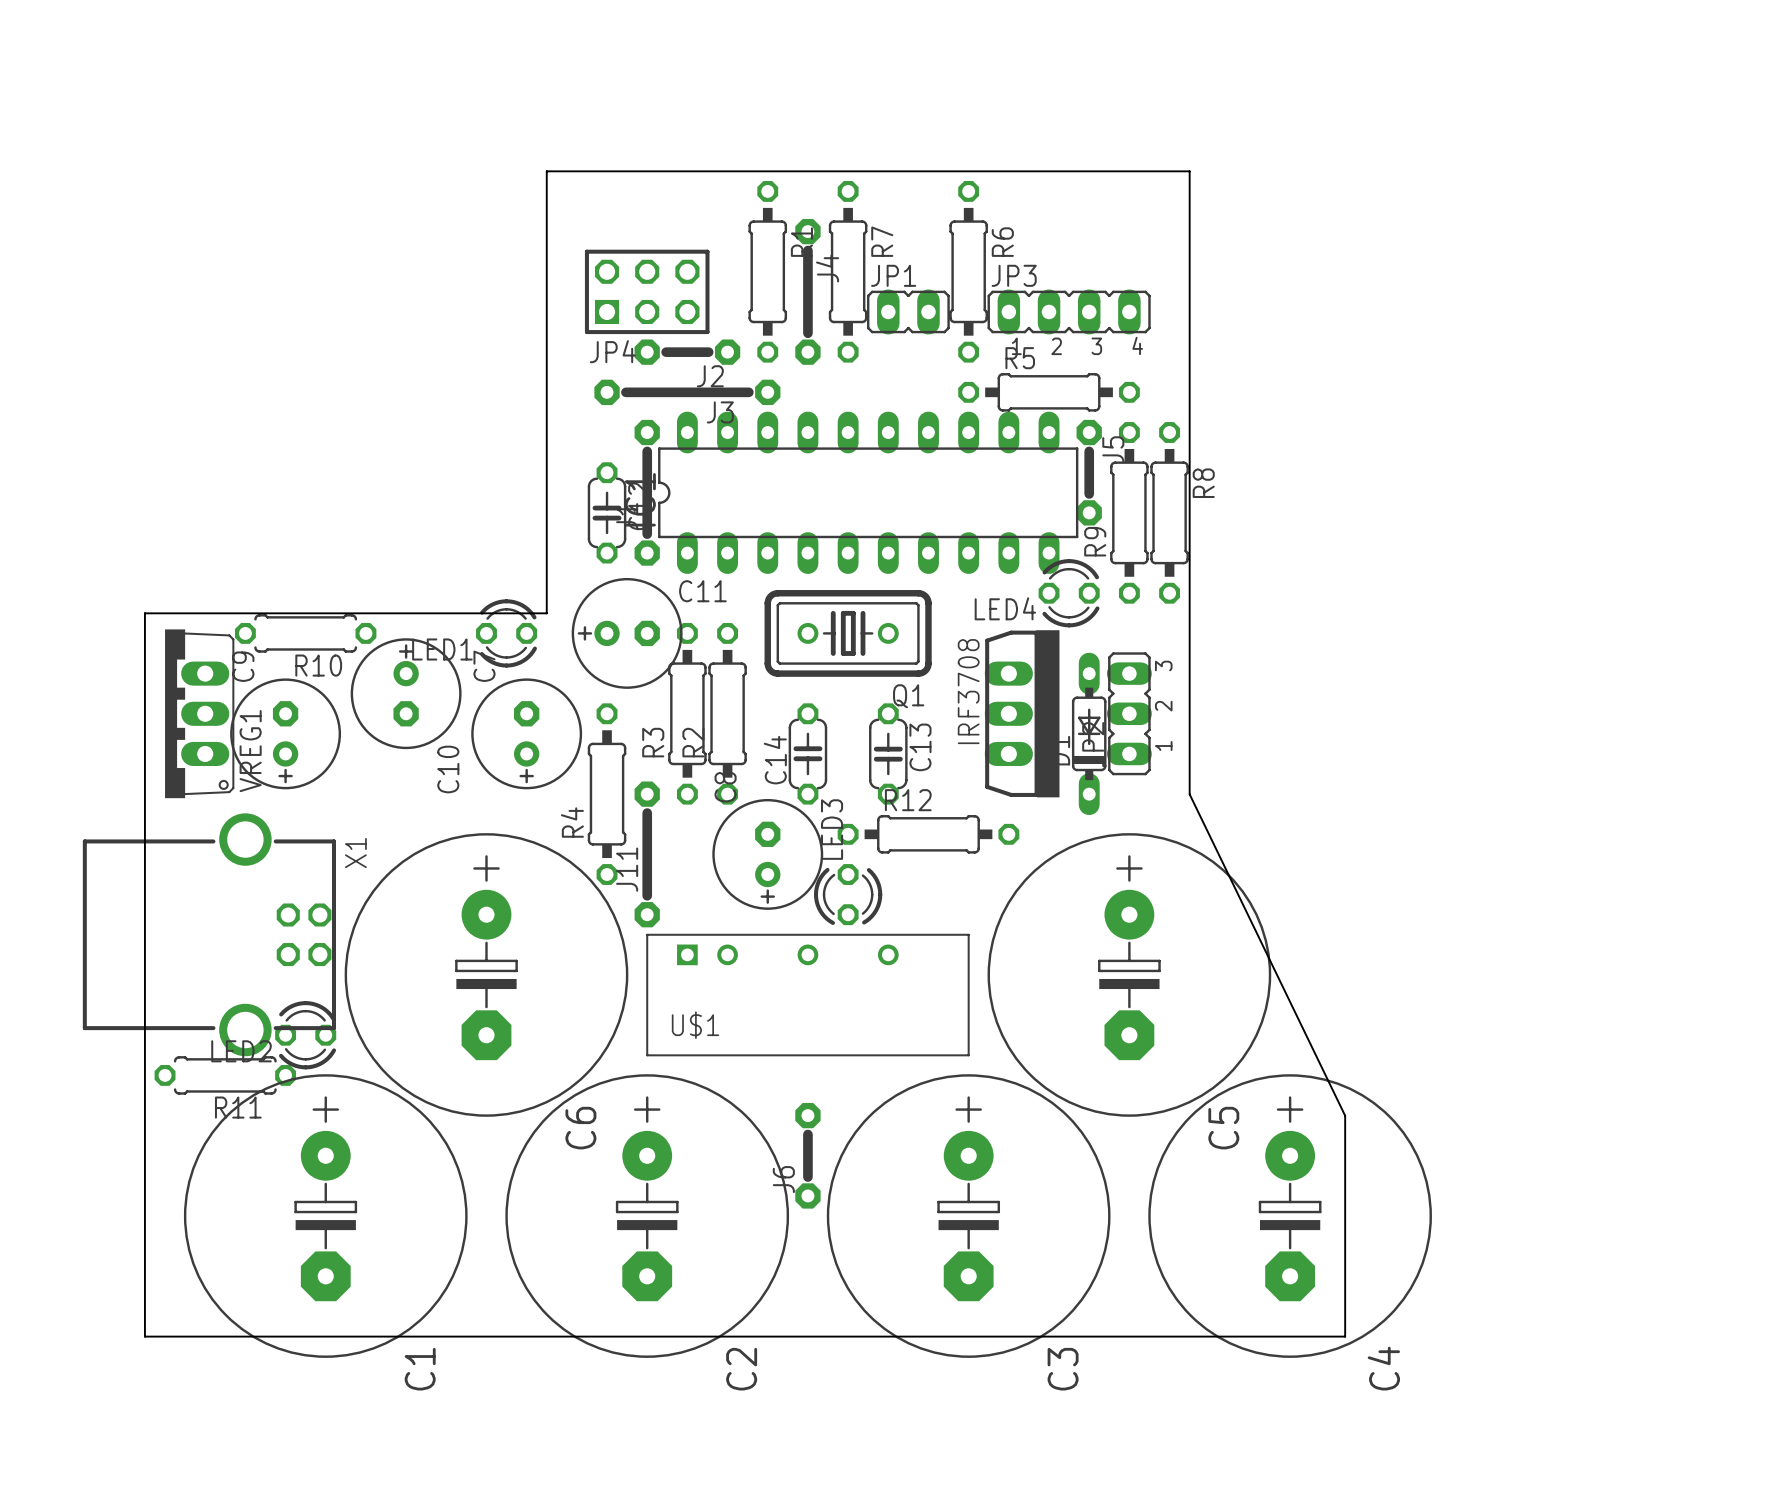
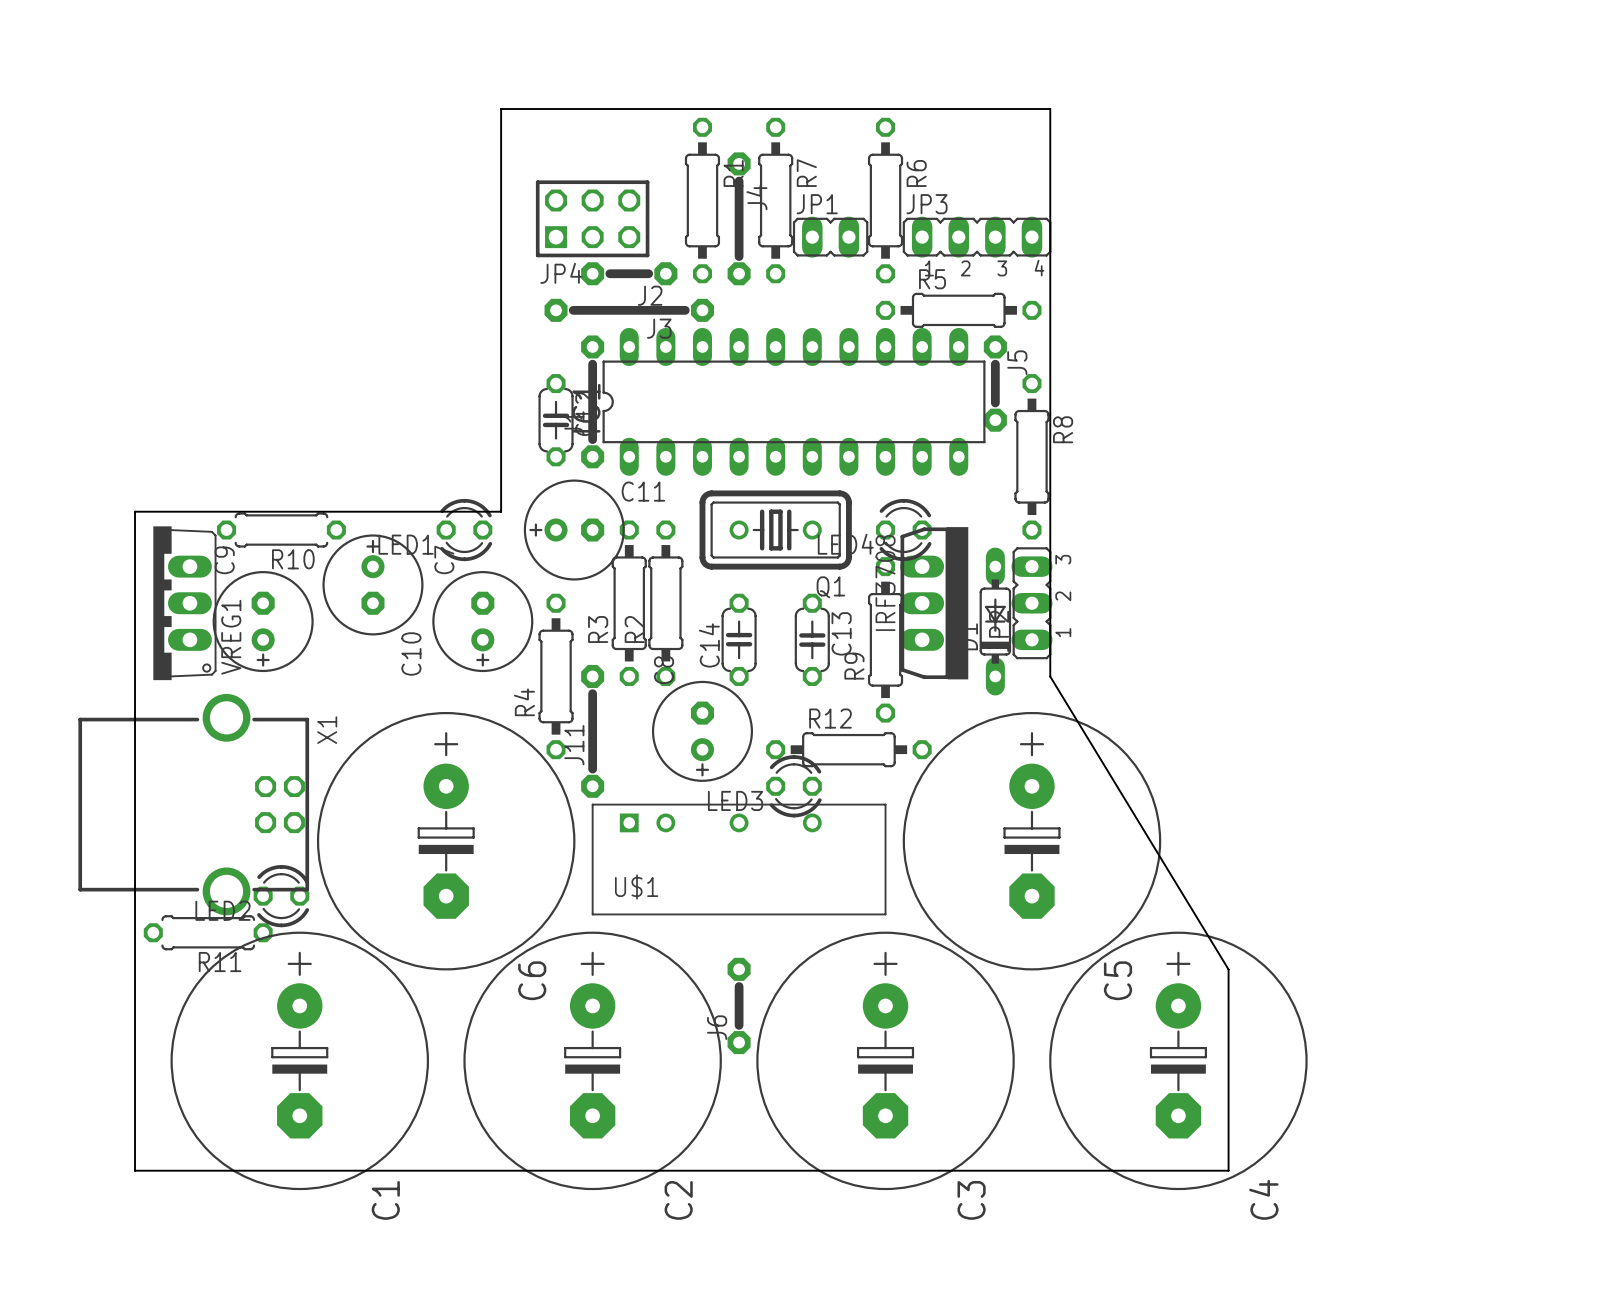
board edge: (1149, 171) (1189, 171) (1189, 794) (1345, 1115) -> (1050, 108) (1050, 676) (1228, 969)
R9 position: (1129, 512) -> (885, 639)
R8 position: (1169, 512) -> (1031, 456)
LED4 position: (1069, 593) -> (903, 530)
R12 position: (928, 834) -> (848, 749)
LED3 rotation: 0° (848, 894) -> 90° counterclockwise (794, 786)

